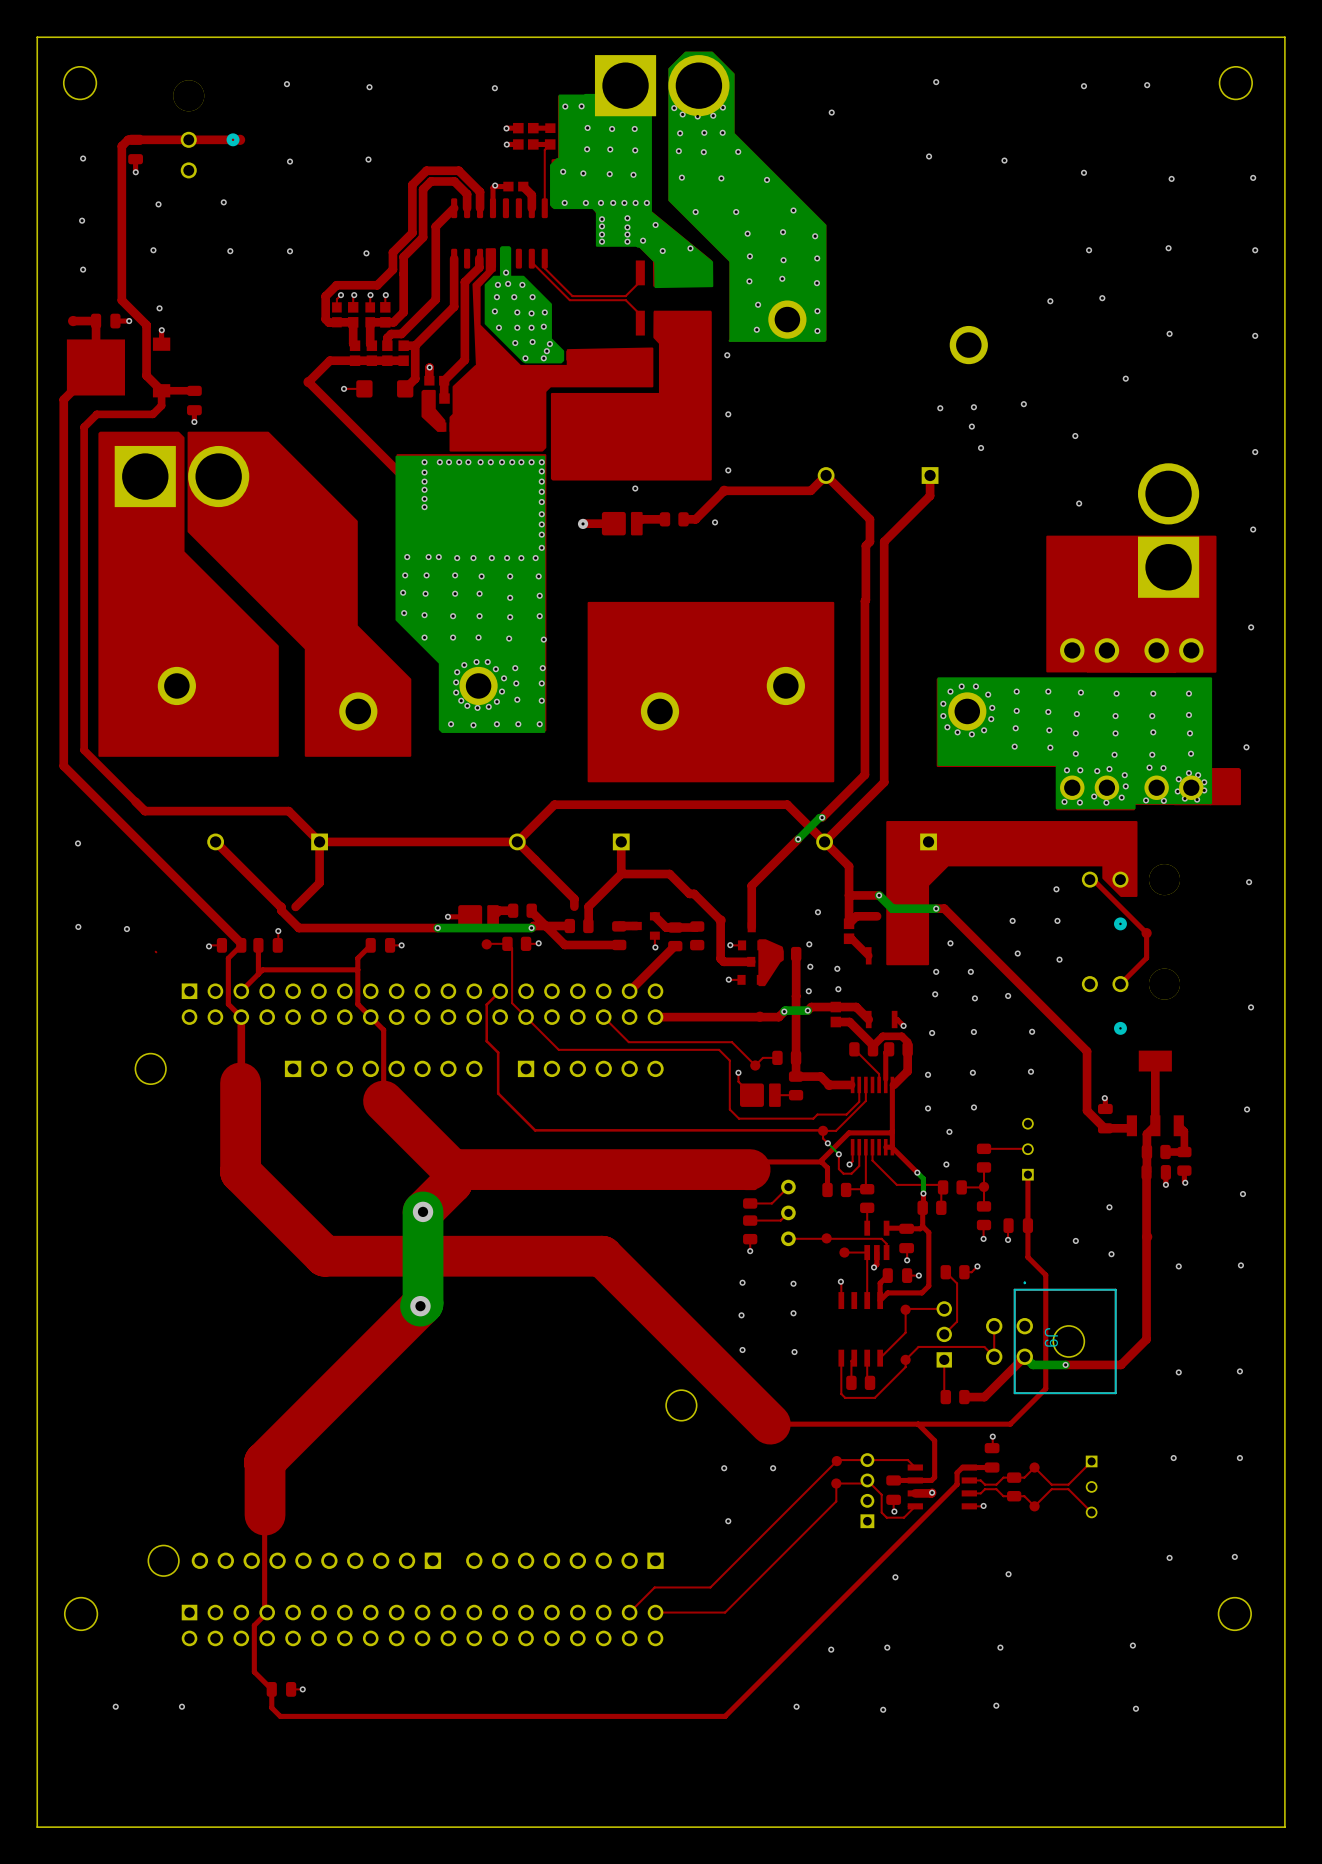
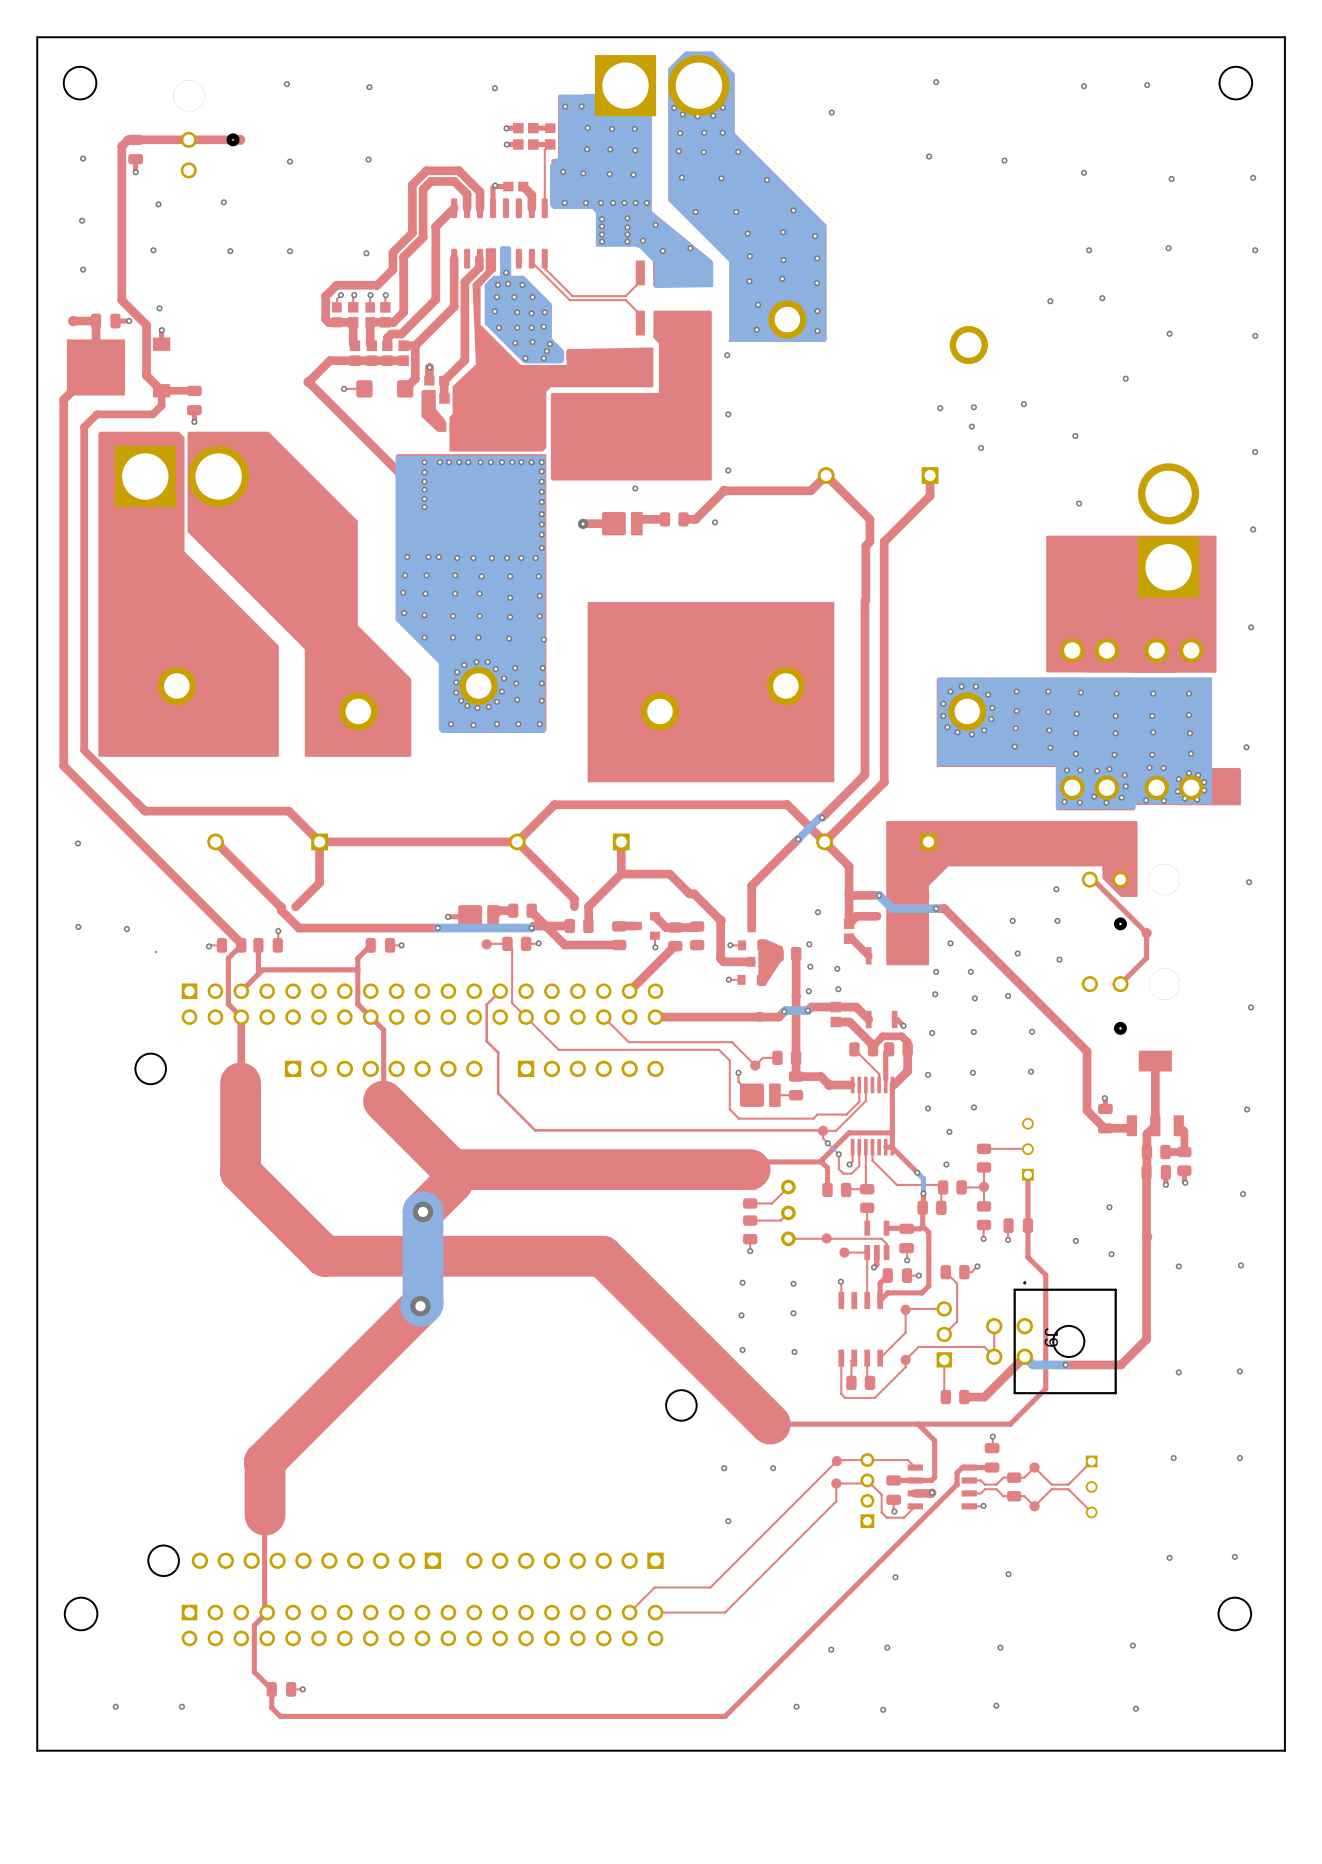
board edge: (1284, 1750) (1284, 1827) (37, 1827) (37, 1750) -> (1284, 1750) (37, 1750)

